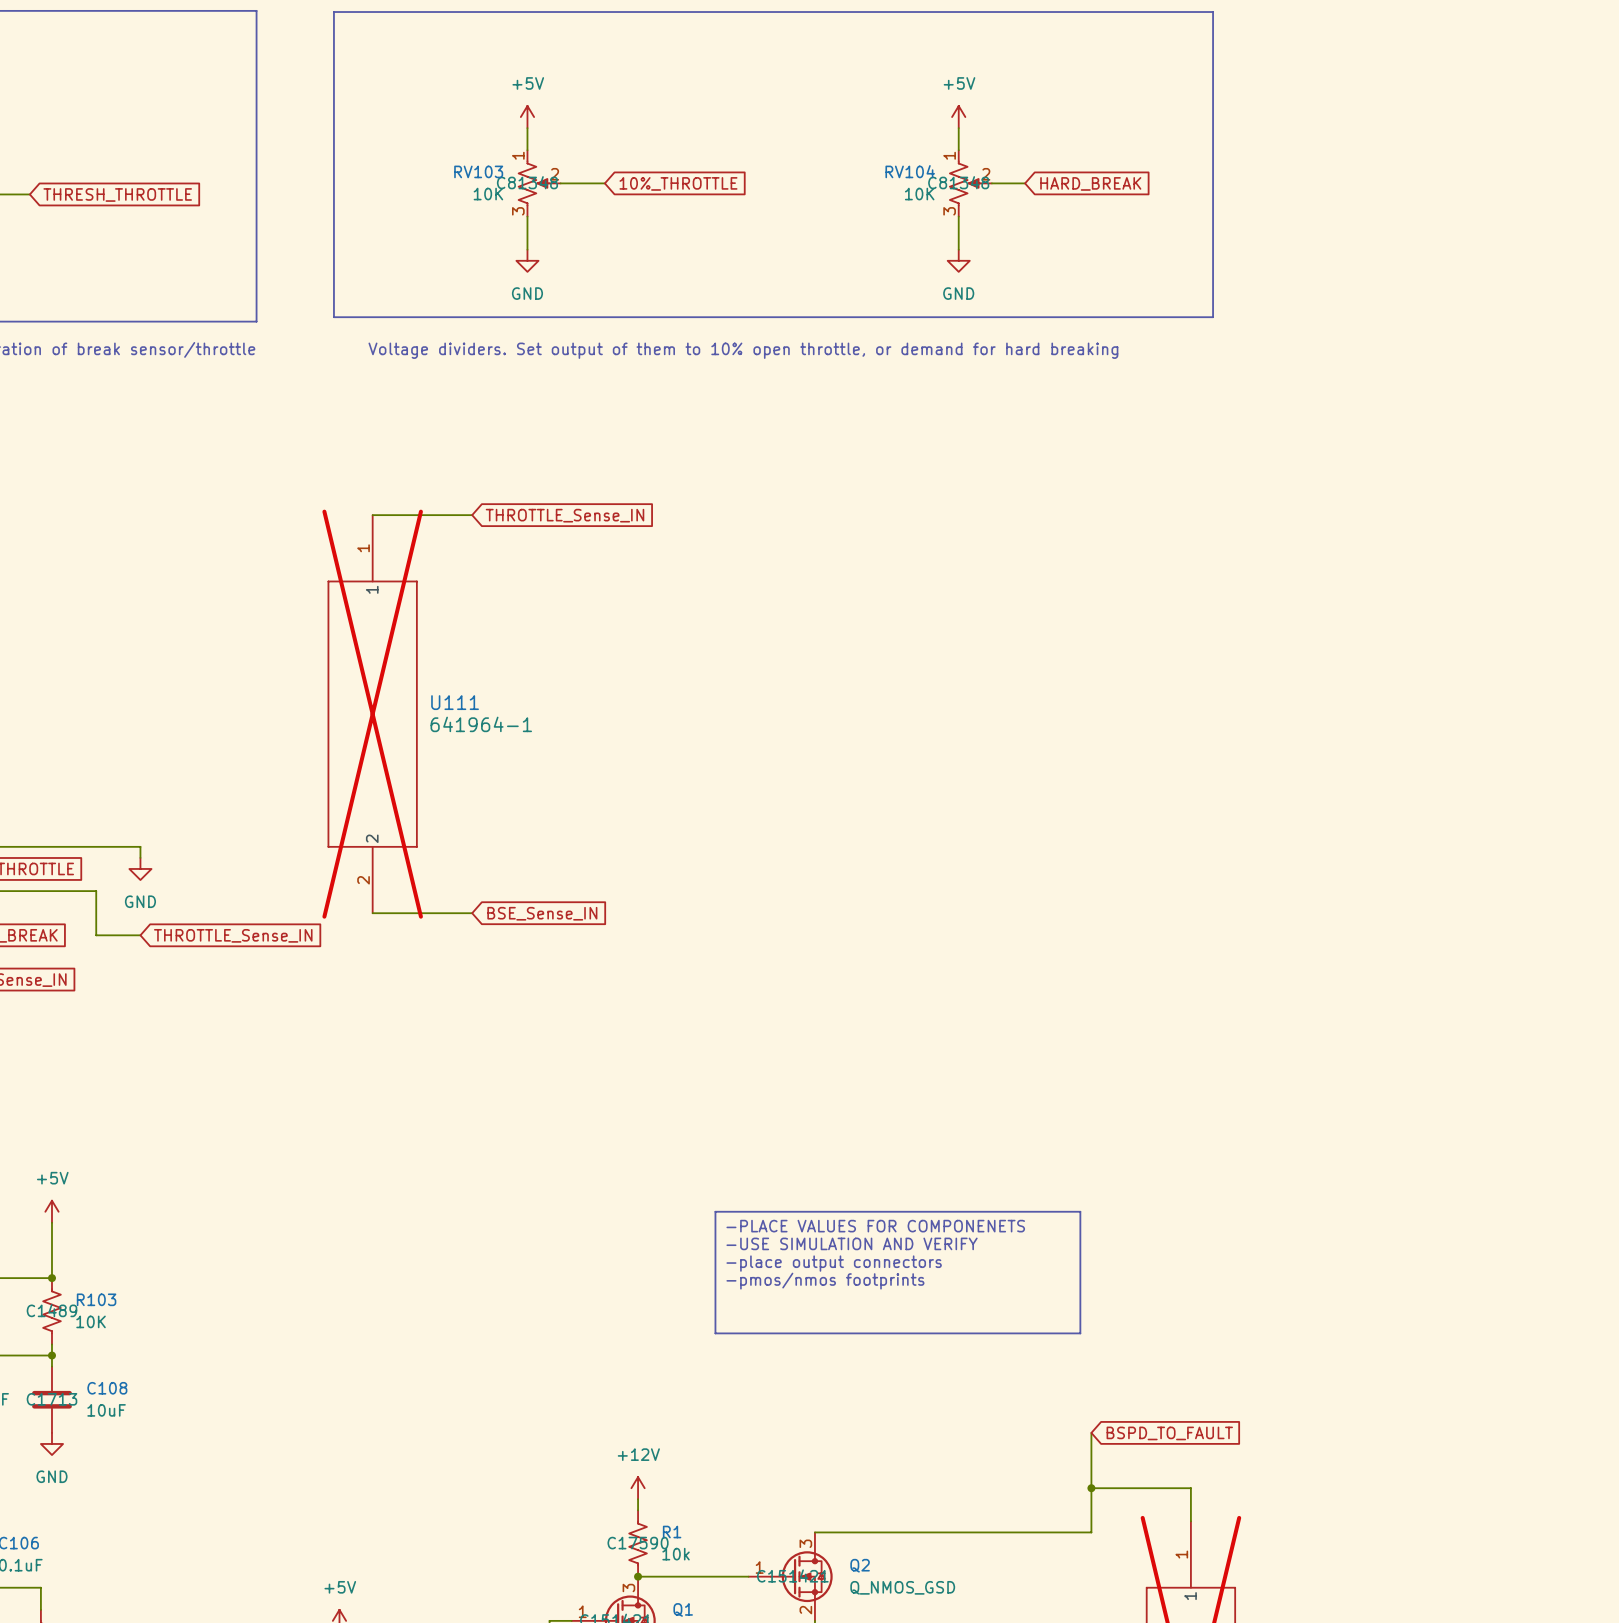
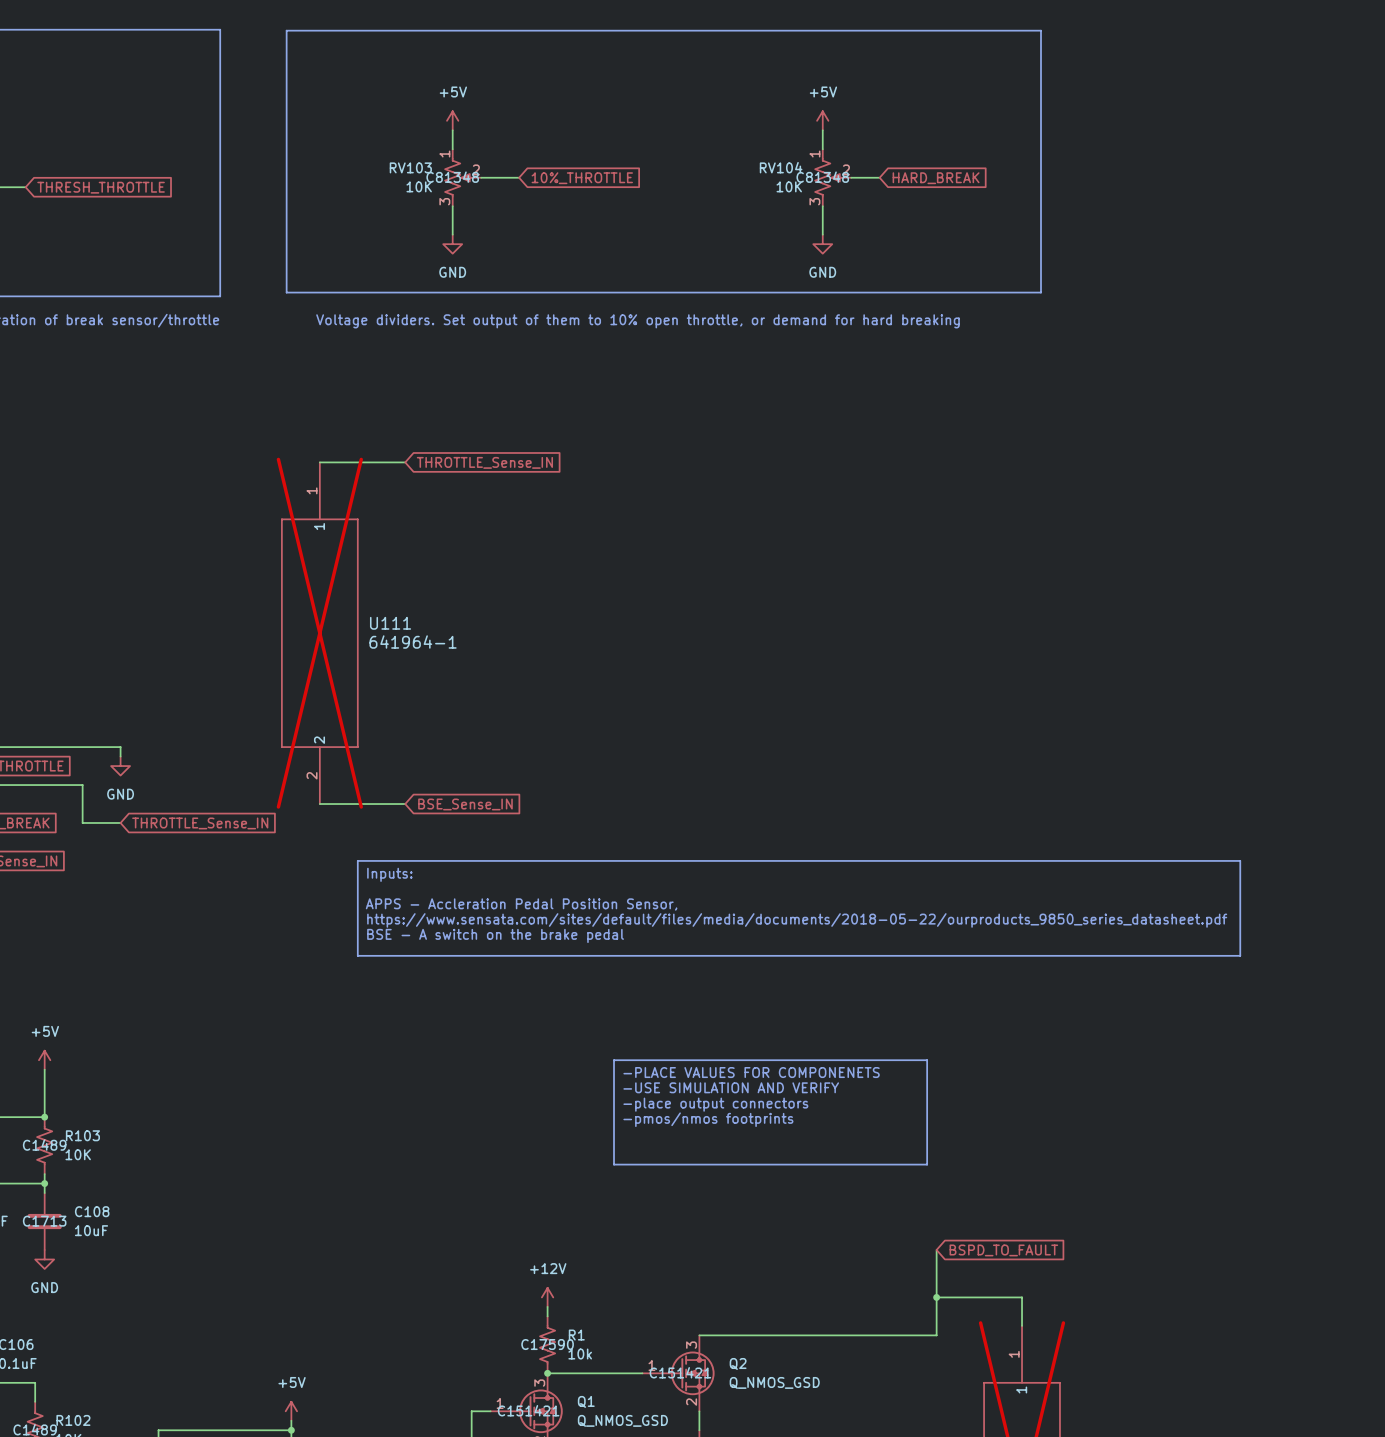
line: none -> (357, 860) (1240, 860) (1240, 955) (357, 955) (357, 860)
text: none -> Inputs: (389, 874)
text: none -> APPS - Accleration Pedal Position Sensor, (521, 904)
text: none -> https://www.sensata.com/sites/default/files/media/documents/2018-05-22/ourproducts_9850_series_datasheet.pdf (797, 920)
text: none -> BSE - A switch on the brake pedal (495, 935)

